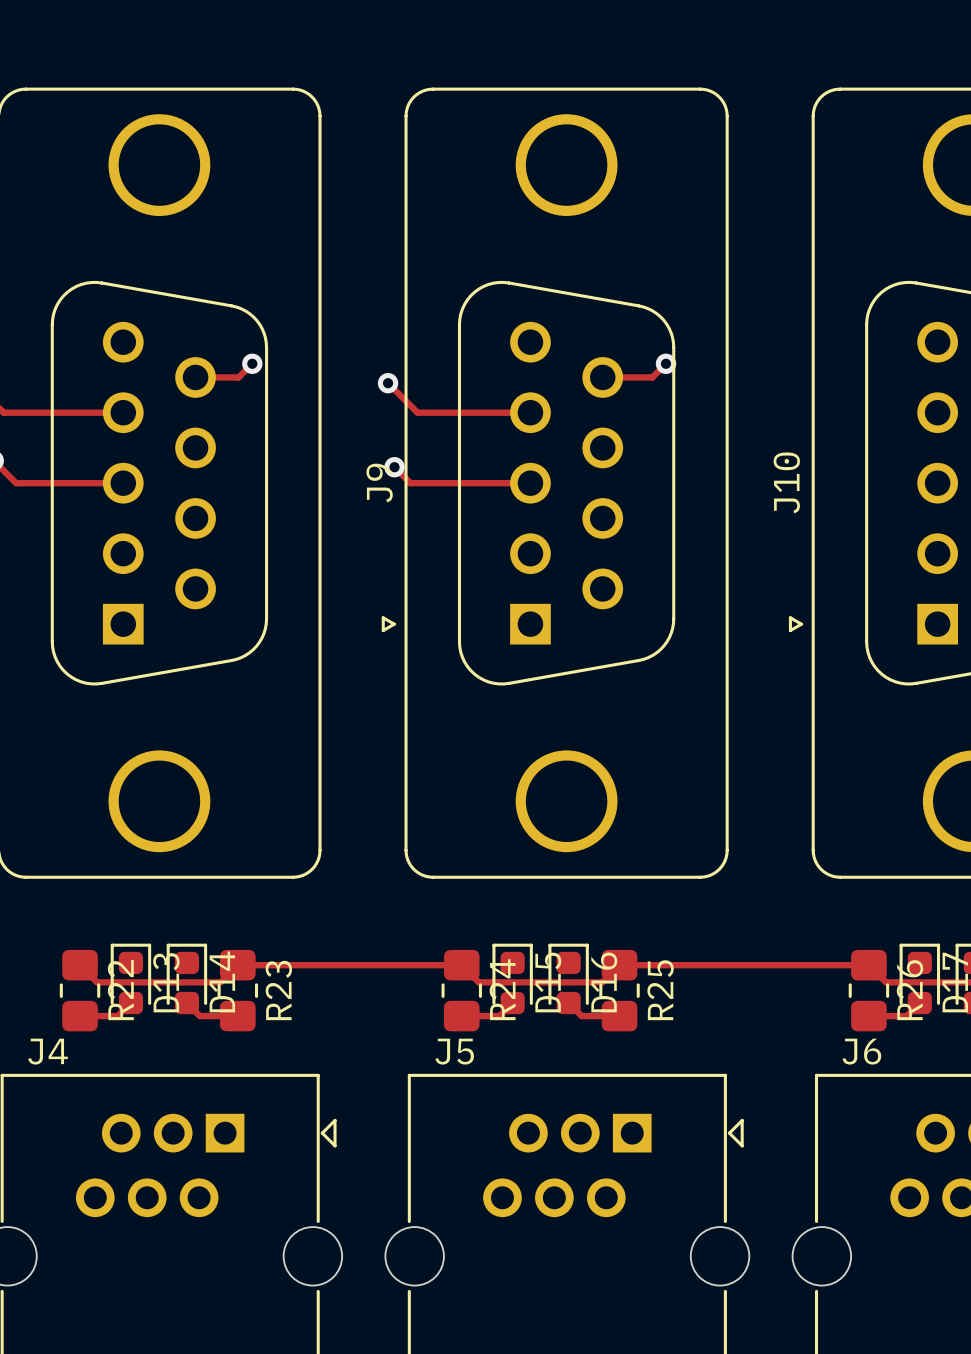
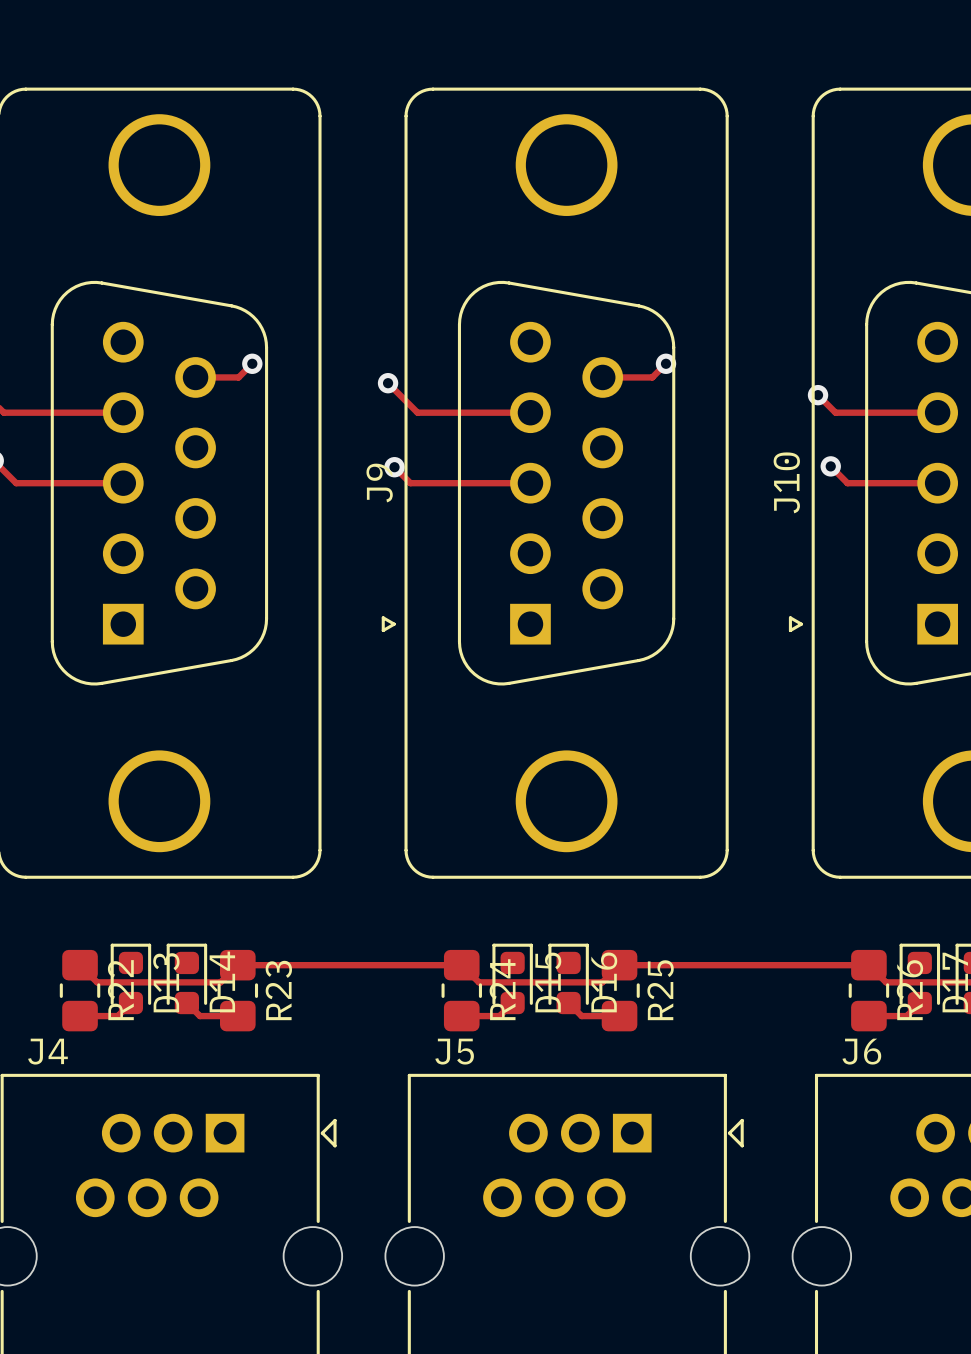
track: none -> (818, 395) (835, 412) (937, 412)
via: none -> (818, 395)
track: none -> (830, 466) (847, 483) (937, 483)
via: none -> (830, 466)

